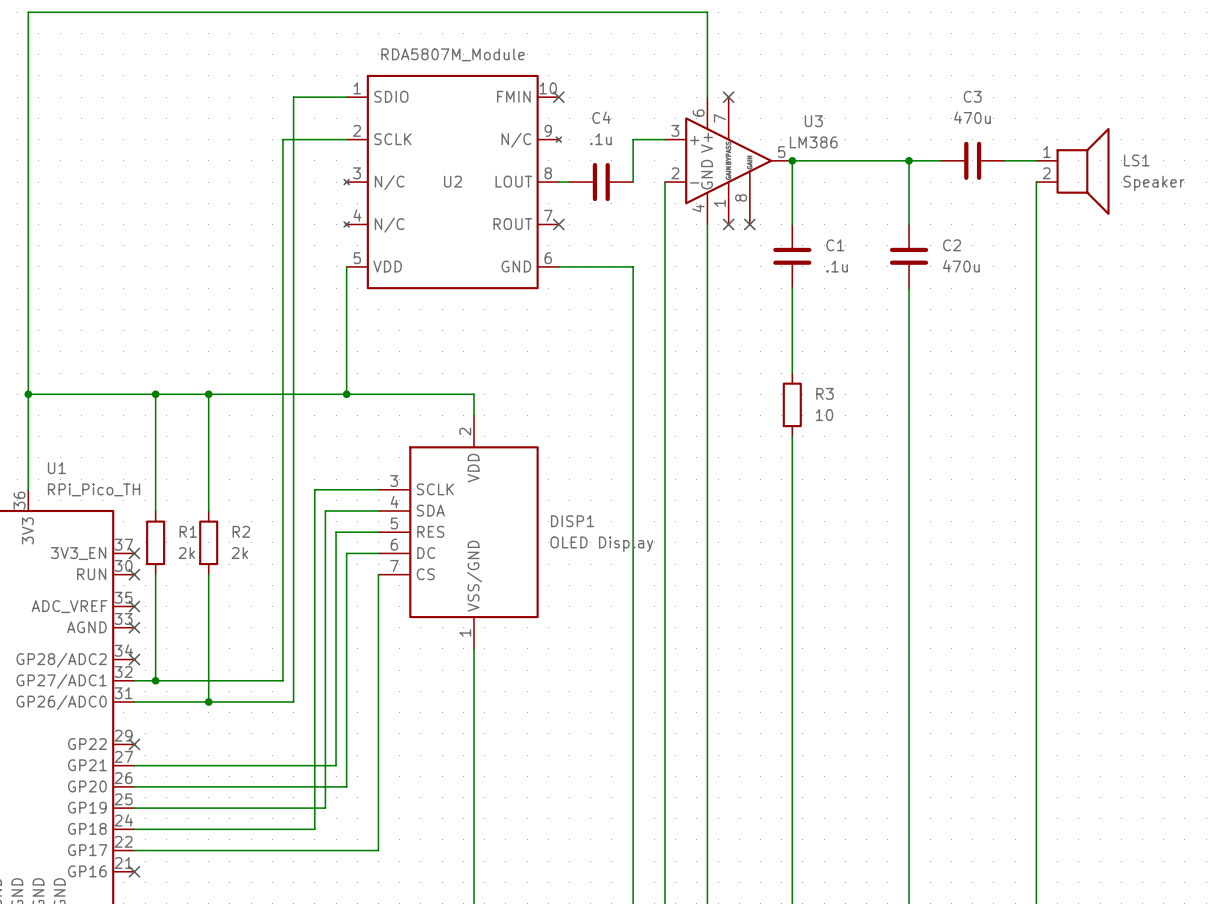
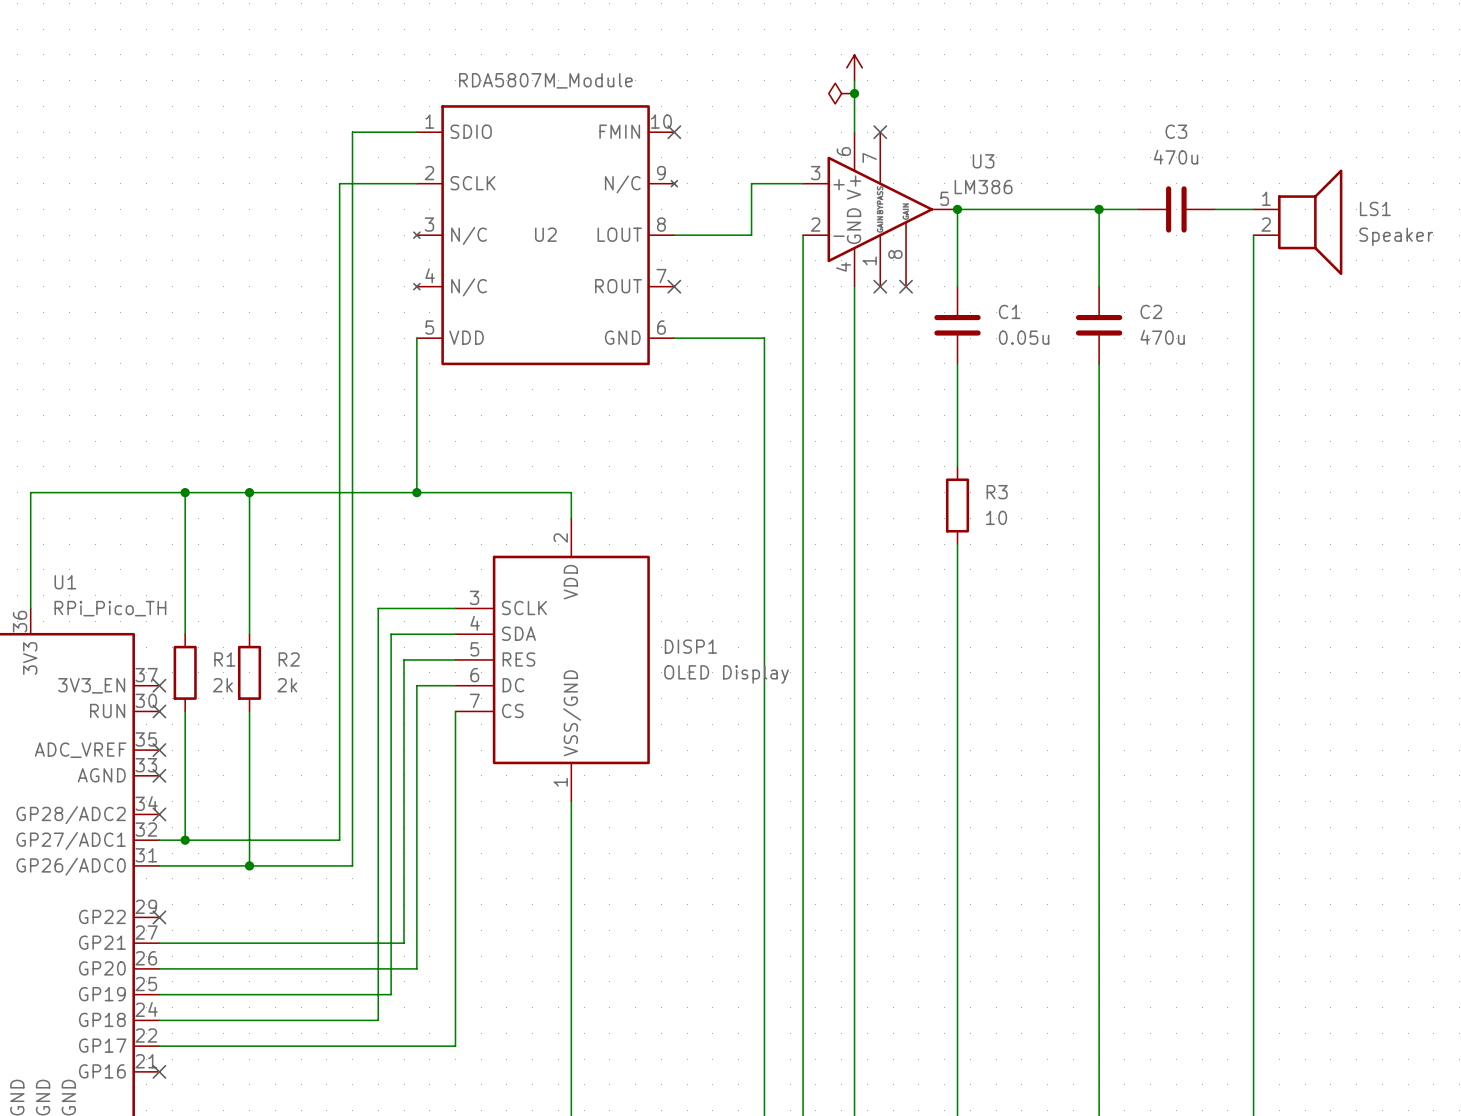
power symbol: none -> (854, 67)
wire: (707, 54) (707, 12) (28, 12) (28, 394) -> none
power symbol: none -> (841, 93)
junction: none -> (854, 93)
wire: (633, 139) (633, 182) -> (764, 183) (751, 183) (751, 235) (687, 235)
C4: .1u (601, 182) -> none
C1 value: .1u (837, 266) -> 0.05u (1024, 337)
junction: (28, 394) -> none

